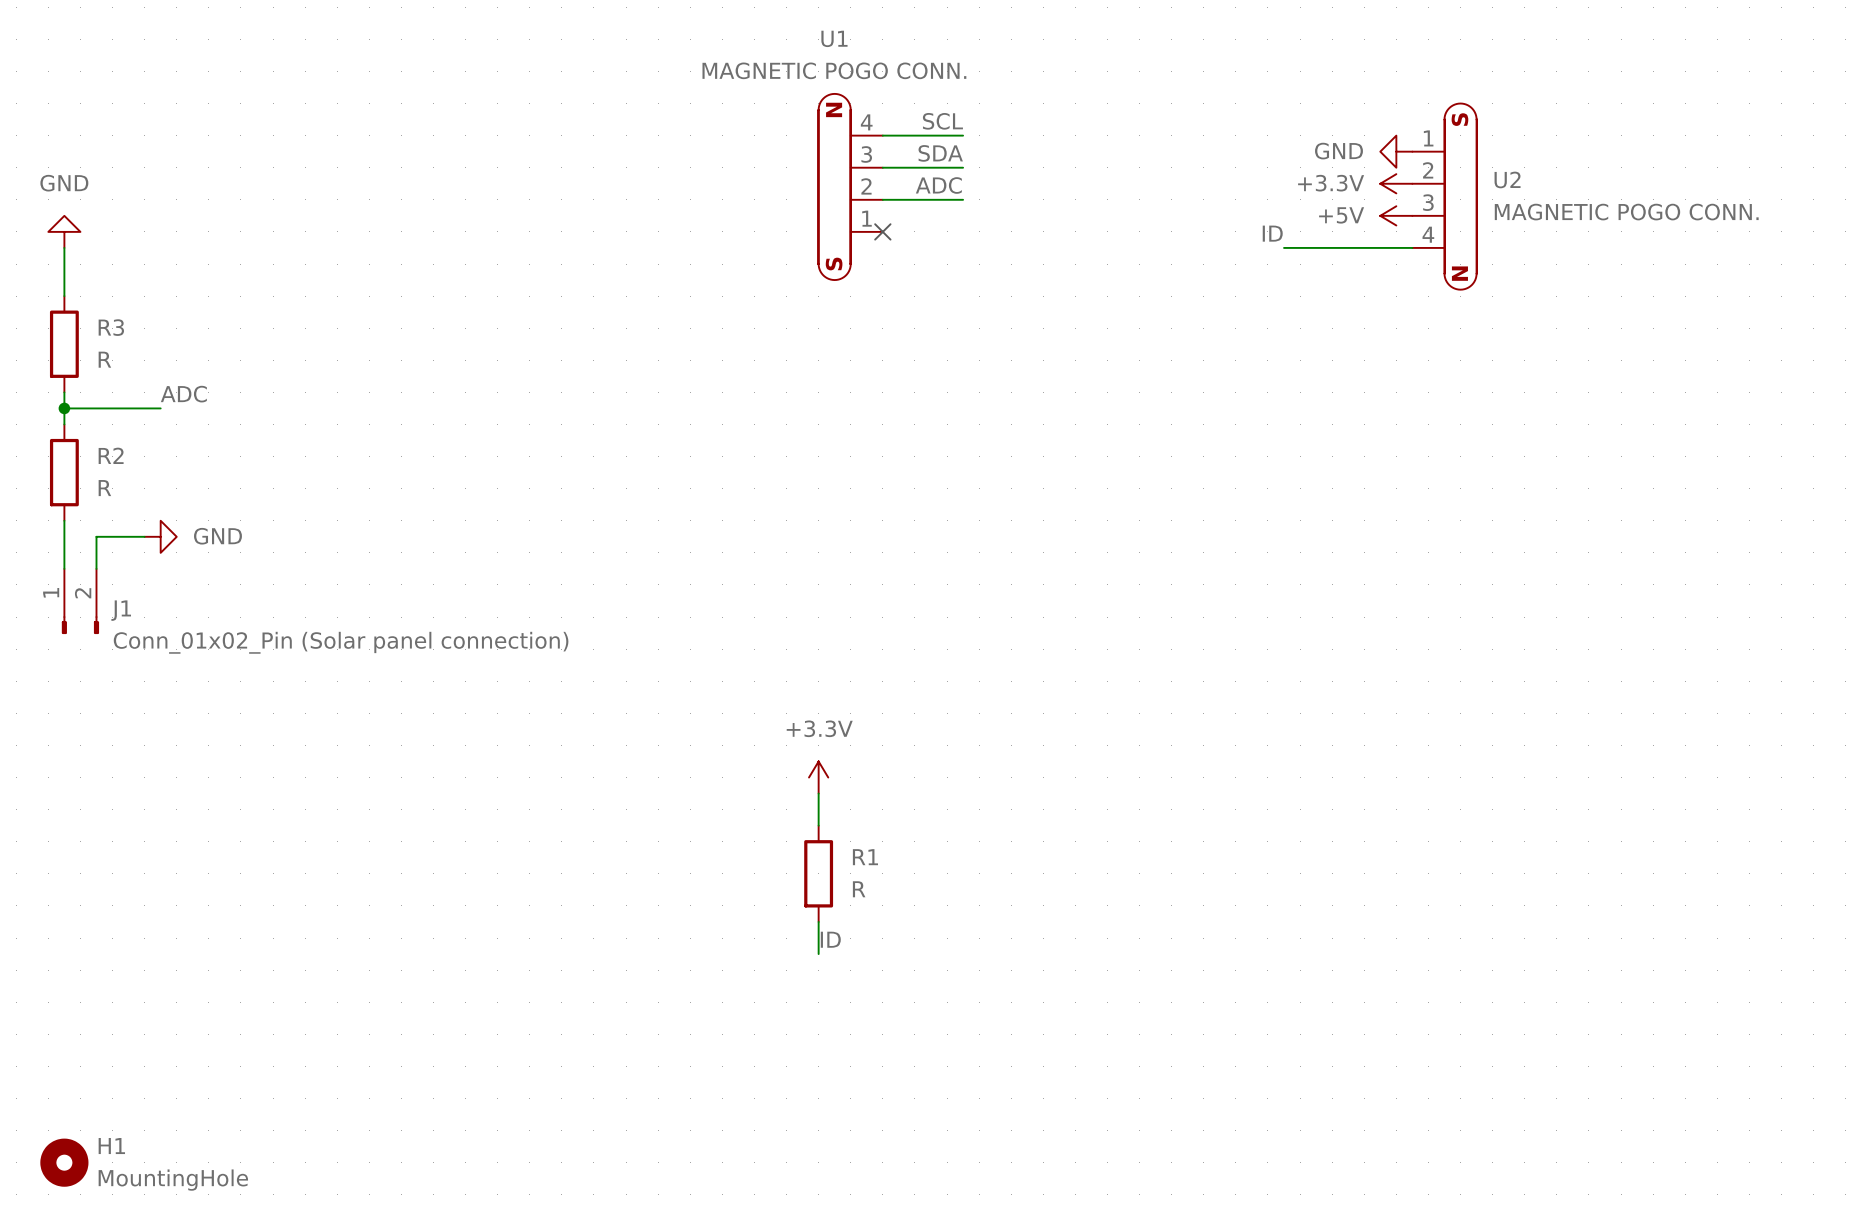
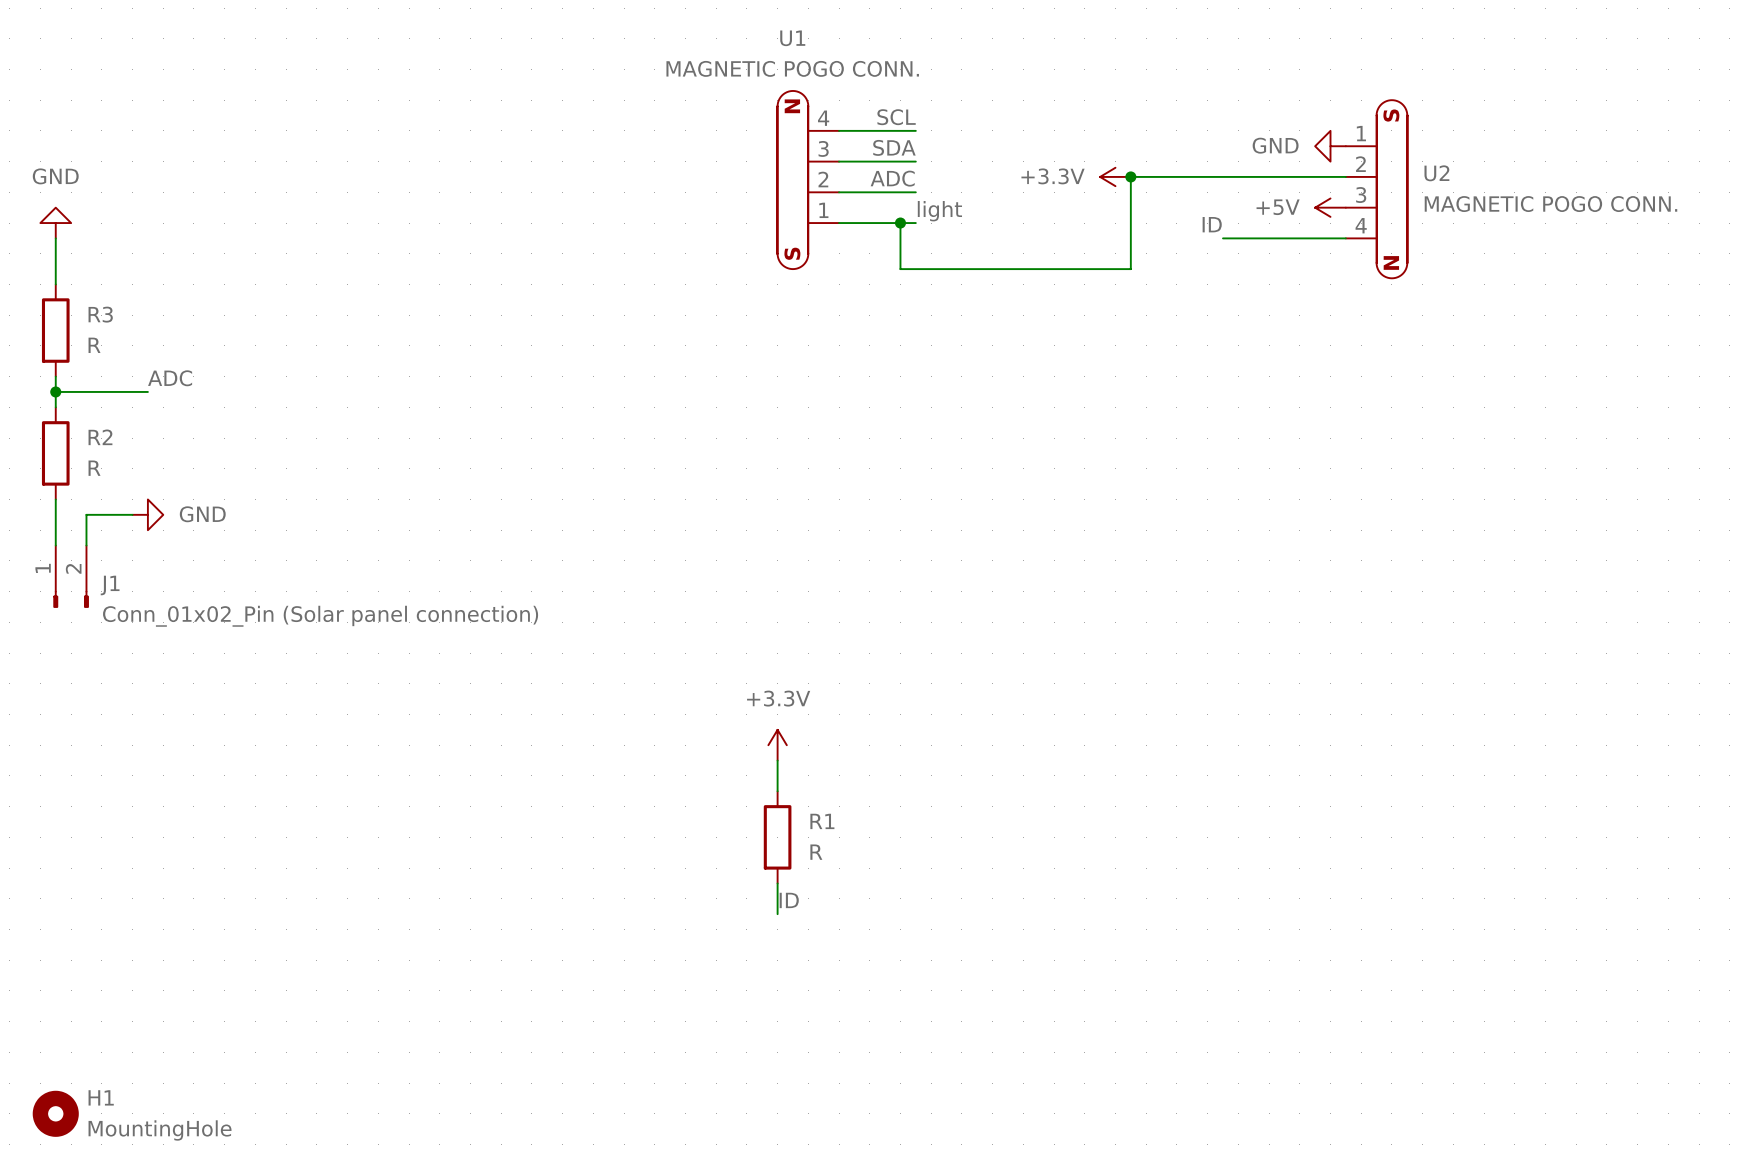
junction: none -> (1130, 176)
power symbol position: +3.3V (1396, 183) -> +3.3V (1115, 176)
wire: none -> (1345, 176) (1130, 176) (1130, 269) (900, 269) (900, 223)
label: none -> light (939, 211)
wire: none -> (839, 223) (915, 223)
no-connect mark: (882, 231) -> none
junction: none -> (900, 223)

